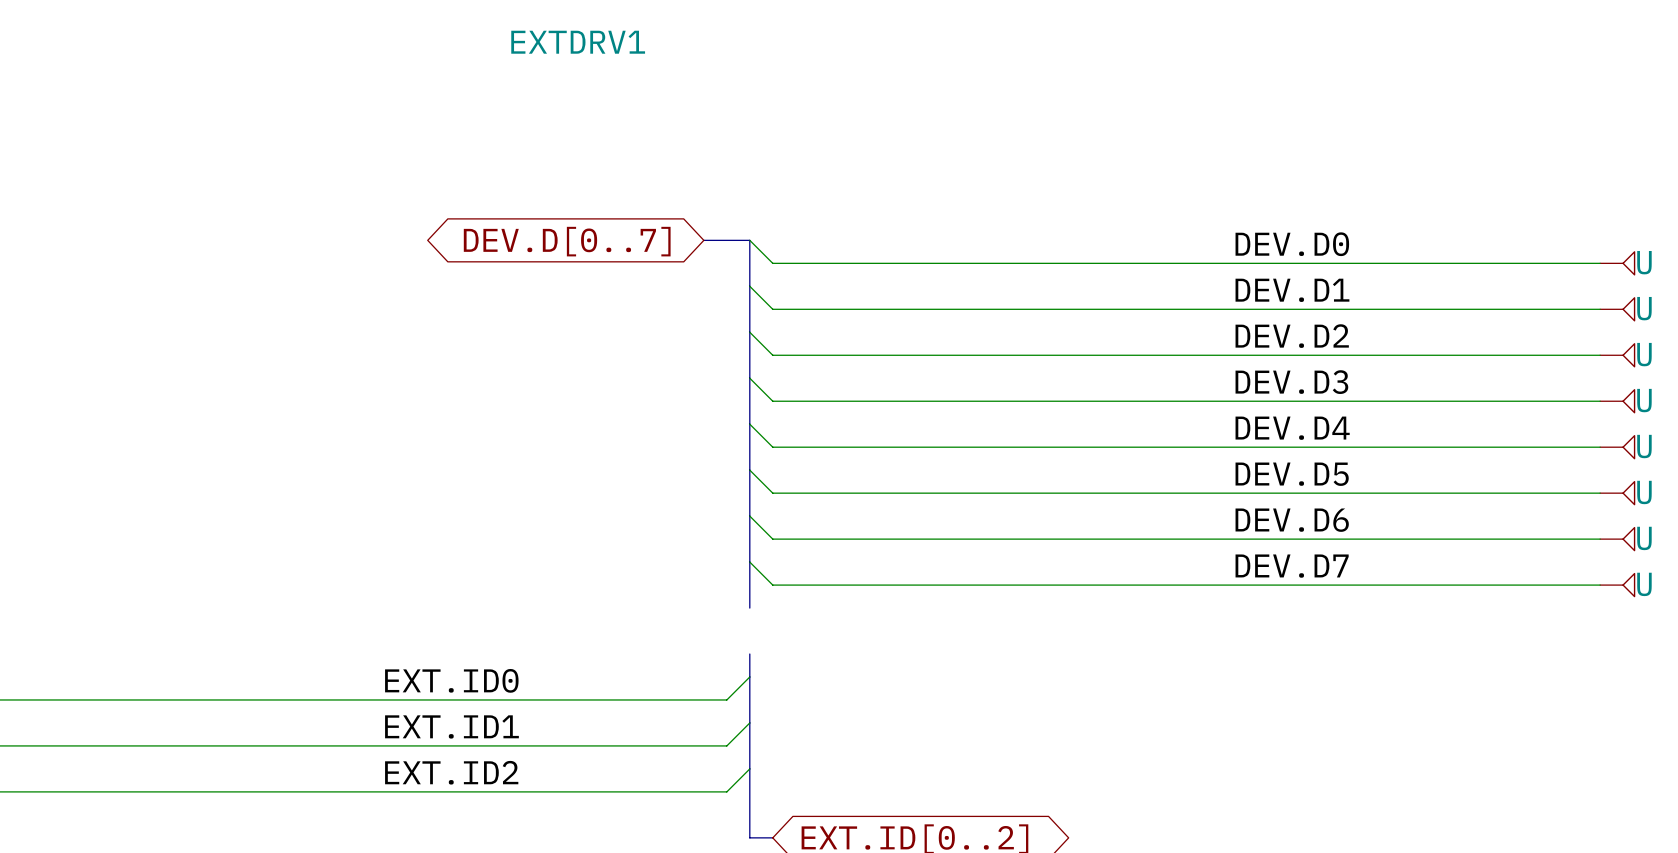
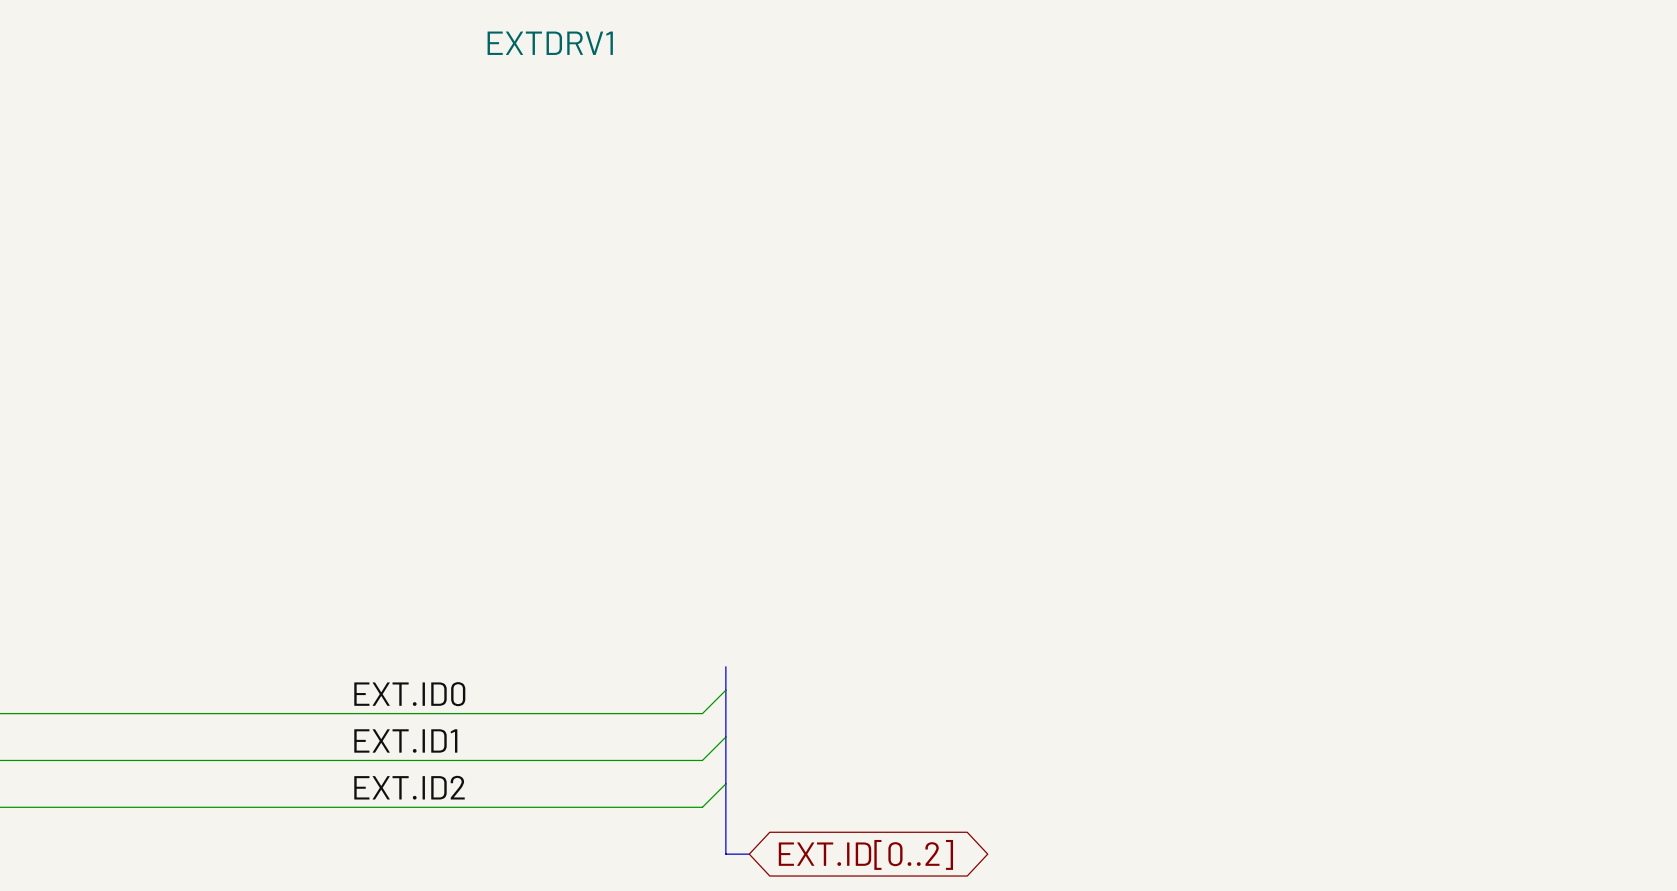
bus: (703, 240) (749, 240) (749, 608) -> none
wire: (749, 240) (772, 263) (1600, 263) -> none
global label: DEV.D[0..7] (567, 241) -> none
label: DEV.D0 (1292, 244) -> none
U: (1617, 263) -> none
wire: (749, 286) (772, 309) (1600, 309) -> none
label: DEV.D1 (1292, 290) -> none
U: (1617, 309) -> none
wire: (749, 332) (772, 355) (1600, 355) -> none
label: DEV.D2 (1292, 336) -> none
U: (1617, 355) -> none
wire: (749, 378) (772, 401) (1600, 401) -> none
label: DEV.D3 (1291, 382) -> none
U: (1617, 401) -> none
wire: (749, 424) (772, 447) (1600, 447) -> none
label: DEV.D4 (1292, 428) -> none
U: (1617, 447) -> none
wire: (749, 470) (772, 493) (1600, 493) -> none
label: DEV.D5 (1292, 474) -> none
U: (1617, 493) -> none
wire: (749, 516) (772, 539) (1600, 539) -> none
label: DEV.D6 (1292, 520) -> none
U: (1617, 539) -> none
wire: (749, 562) (772, 585) (1600, 585) -> none
label: DEV.D7 (1292, 566) -> none
U: (1617, 585) -> none

